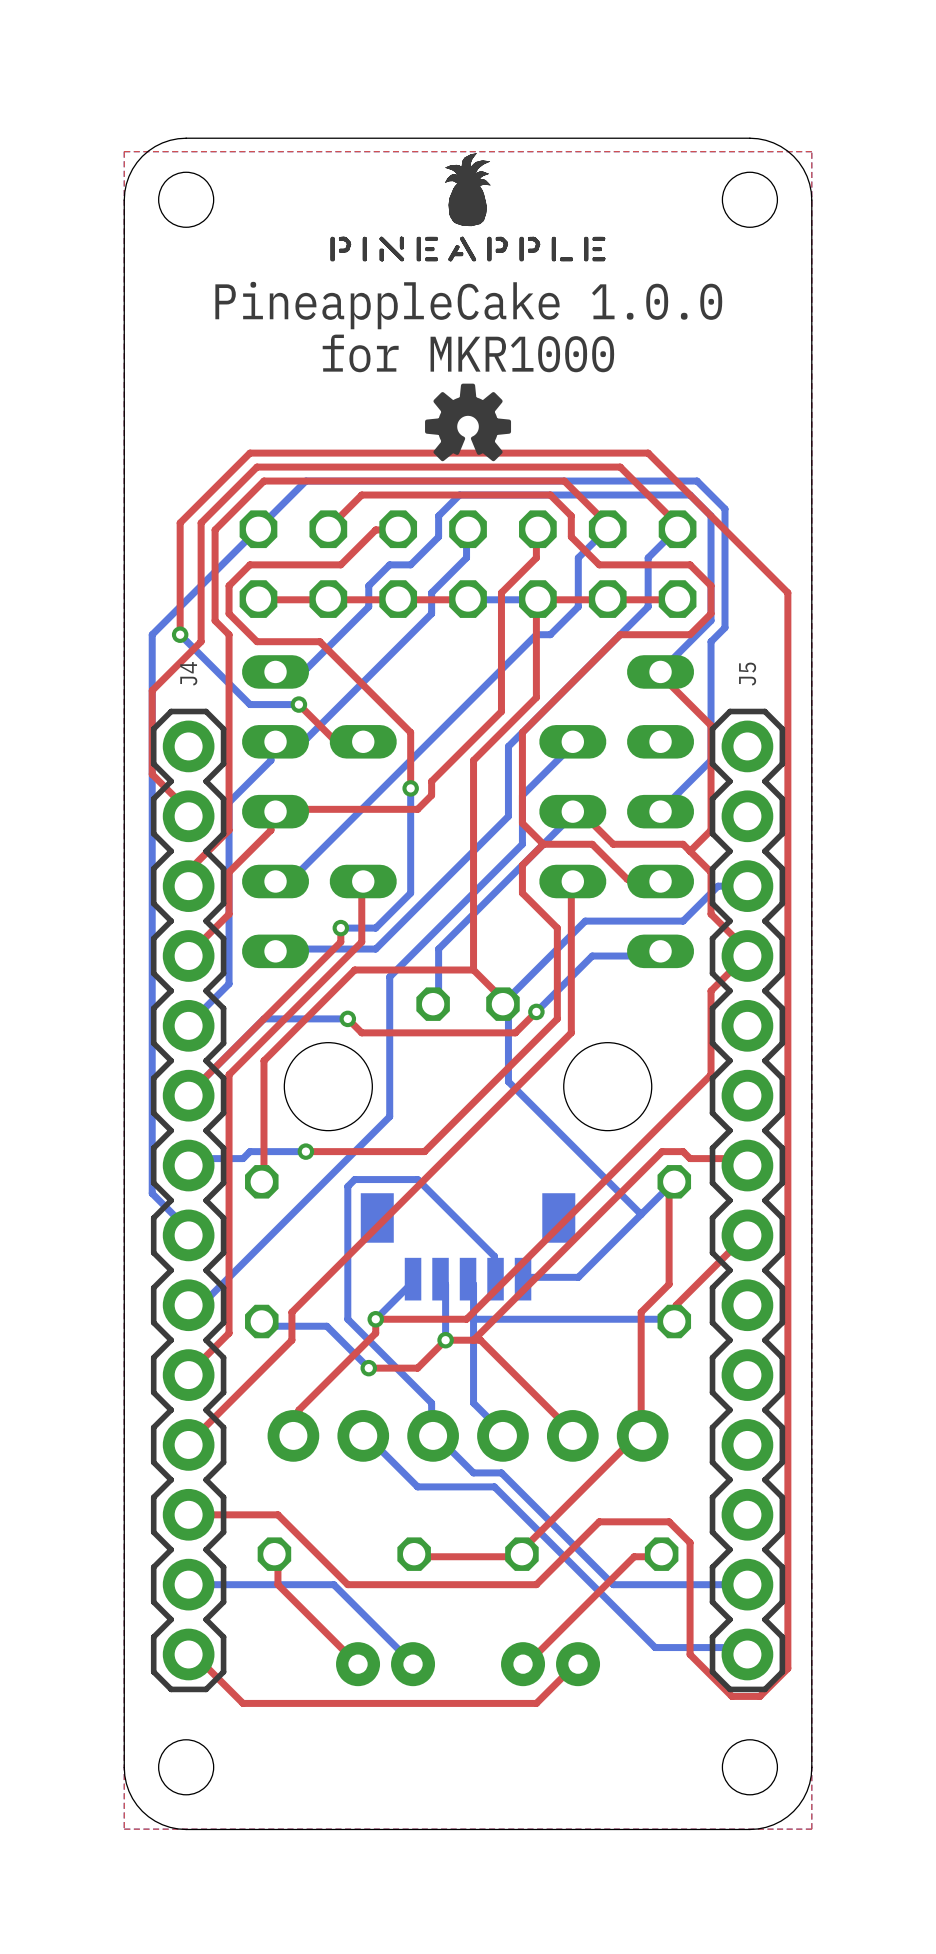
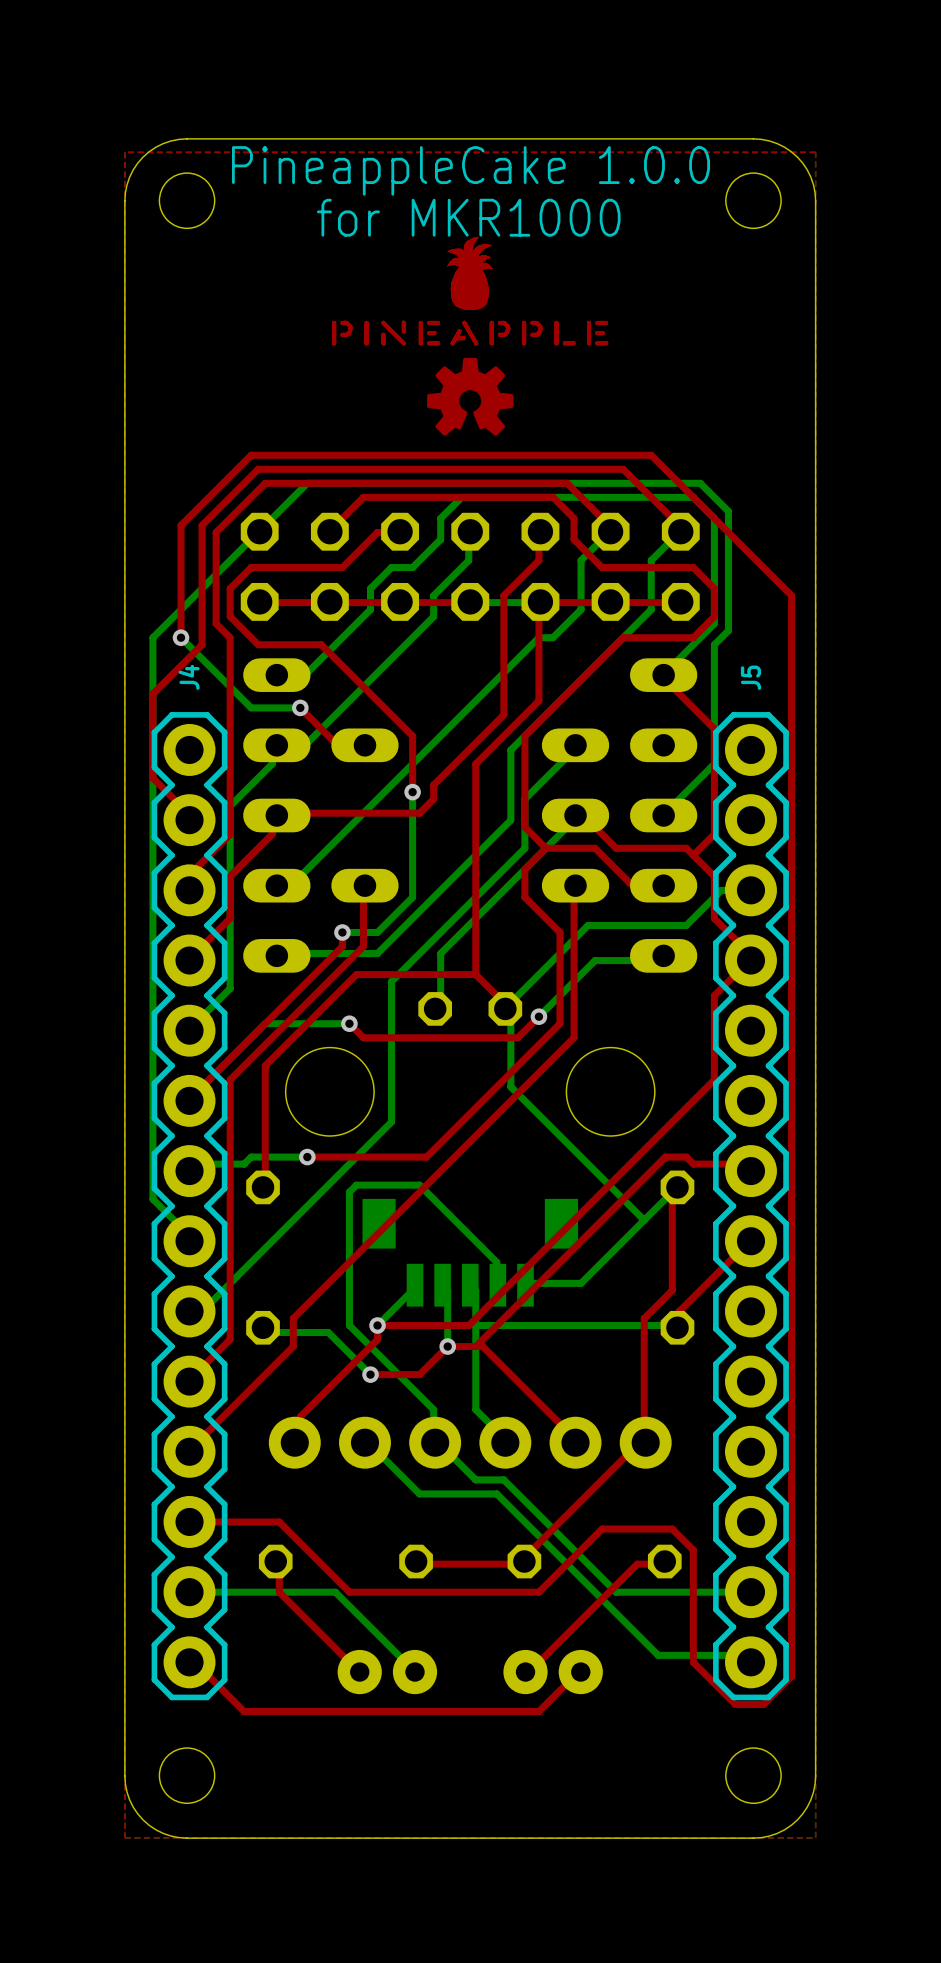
drawing: [330, 153, 606, 262] -> none
drawing: none -> [332, 236, 609, 346]
text position: PineappleCake 1.0.0 (468, 305) -> PineappleCake 1.0.0 (471, 170)
text position: for MKR1000 (468, 353) -> for MKR1000 (468, 217)
drawing shape: [425, 383, 512, 462] -> [427, 357, 514, 436]

